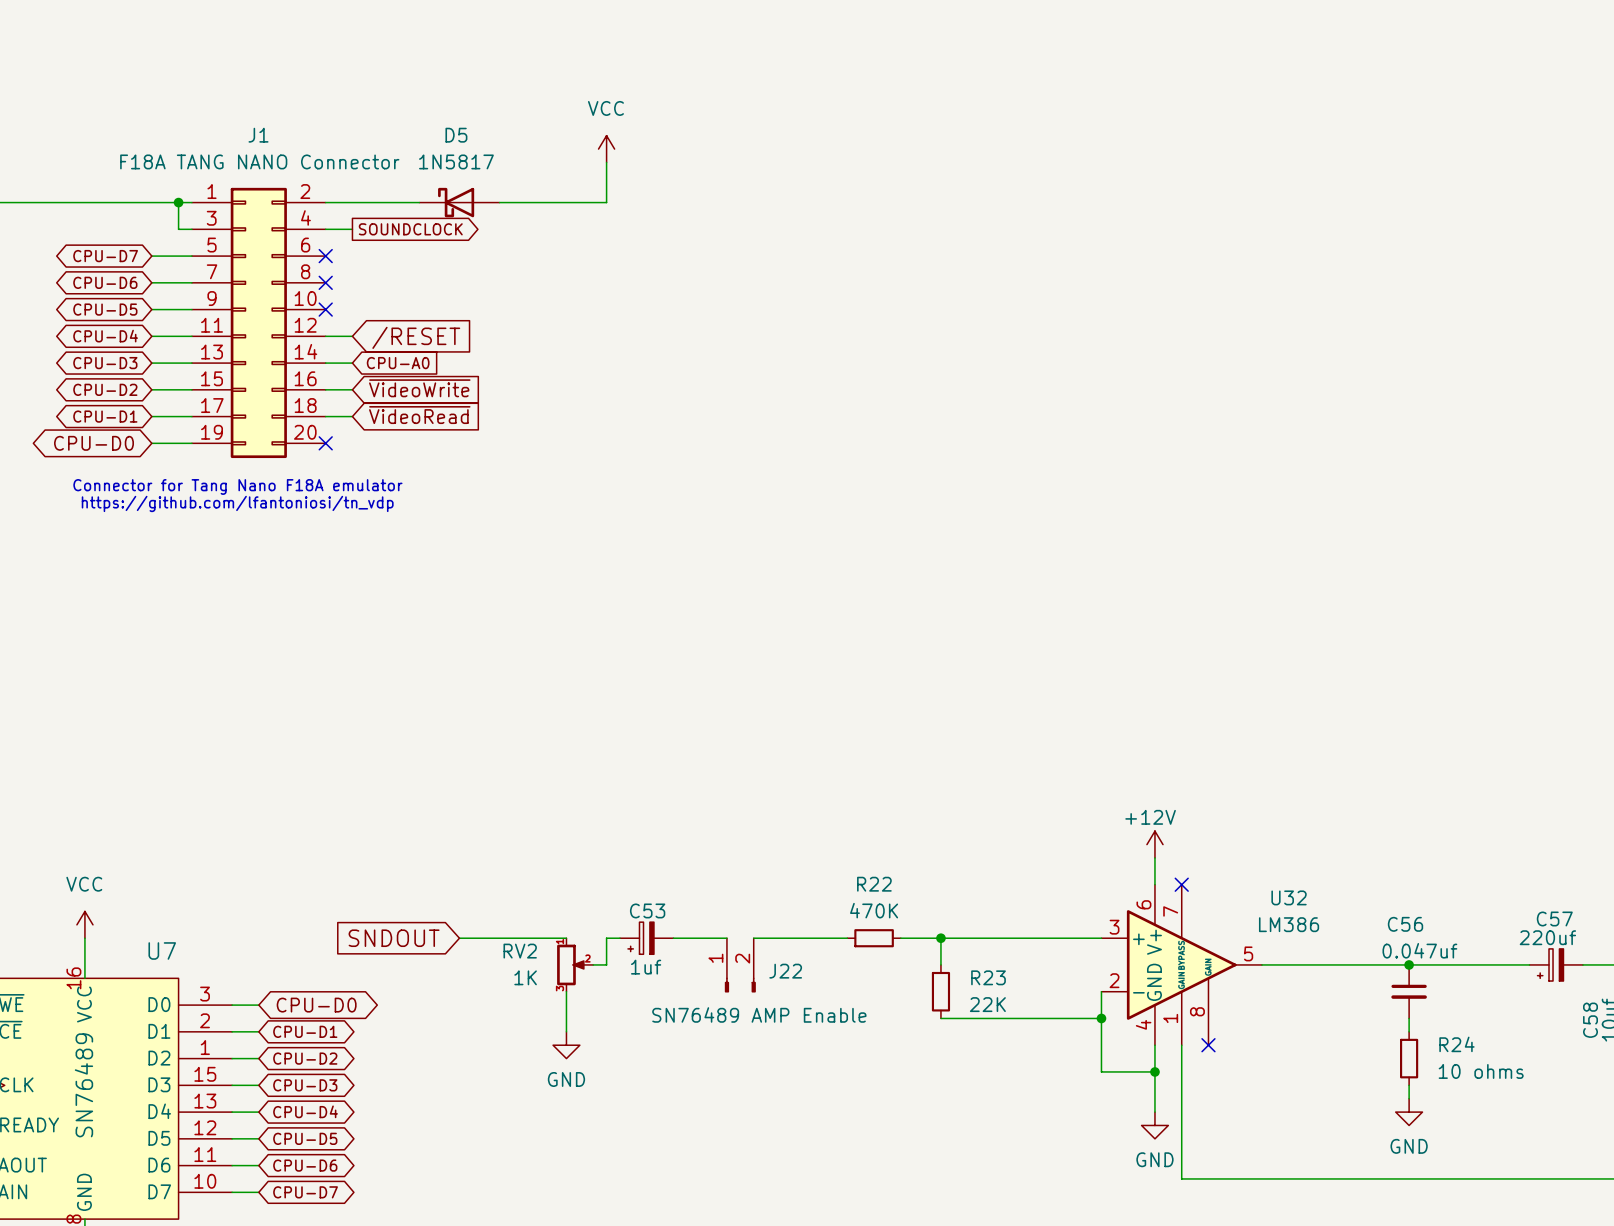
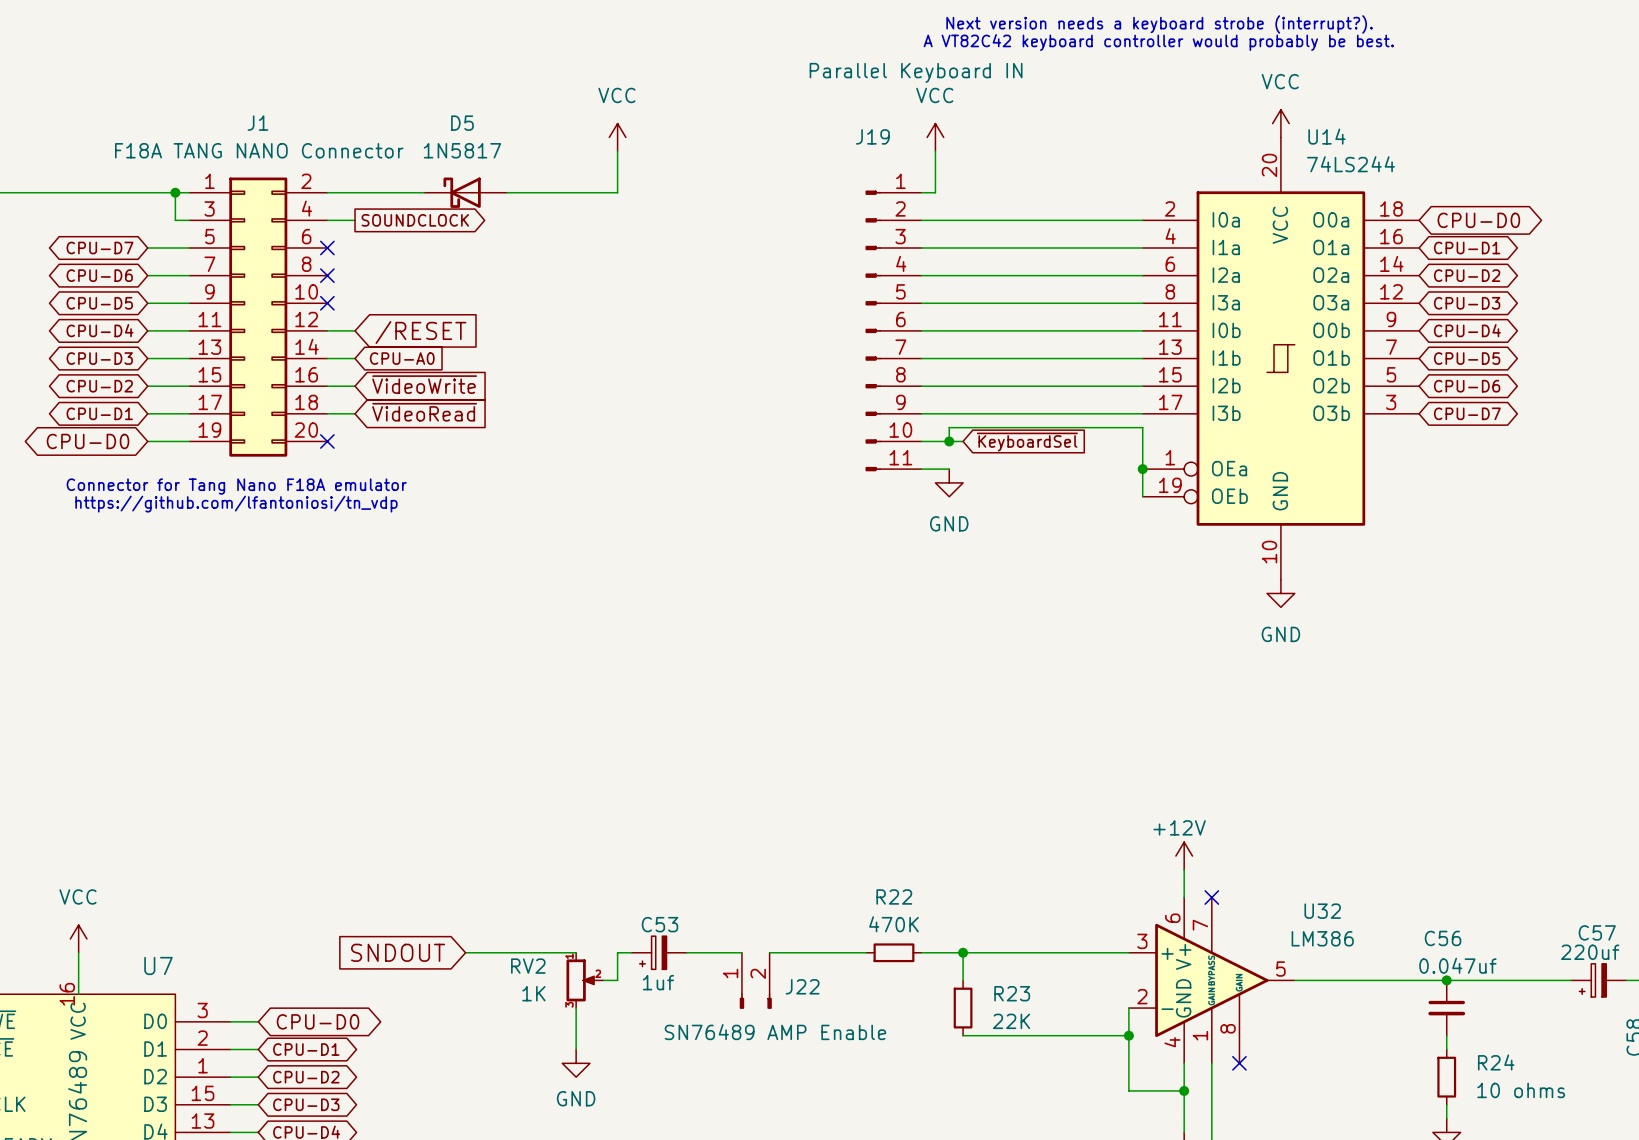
text: none -> Next version needs a keyboard strobe (interrupt?). (1159, 24)
text: none -> A VT82C42 keyboard controller would probably be best. (1158, 42)
power symbol: none -> VCC (1280, 123)
power symbol: none -> VCC (935, 137)
wire: none -> (935, 151) (935, 192) (921, 192)
wire: none -> (921, 220) (1142, 220)
global label: none -> CPU-D0 (1478, 220)
wire: none -> (921, 248) (1142, 248)
global label: none -> CPU-D1 (1467, 248)
wire: none -> (921, 275) (1142, 275)
global label: none -> CPU-D2 (1467, 275)
wire: none -> (921, 303) (1142, 303)
global label: none -> CPU-D3 (1467, 303)
J19: none -> Parallel Keyboard IN (893, 330)
wire: none -> (921, 330) (1142, 330)
global label: none -> CPU-D4 (1467, 330)
wire: none -> (921, 358) (1142, 358)
U14: none -> 74LS244 (1280, 358)
global label: none -> CPU-D5 (1467, 358)
wire: none -> (921, 386) (1142, 386)
global label: none -> CPU-D6 (1467, 386)
wire: none -> (921, 413) (1142, 413)
global label: none -> CPU-D7 (1467, 413)
wire: none -> (921, 441) (963, 441)
wire: none -> (949, 441) (949, 427) (1142, 427) (1142, 496)
junction: none -> (949, 441)
global label: none -> ~{KeyboardSel} (1027, 442)
wire: none -> (921, 469) (949, 469)
junction: none -> (1142, 469)
power symbol: none -> GND (949, 482)
power symbol: none -> GND (1280, 593)

